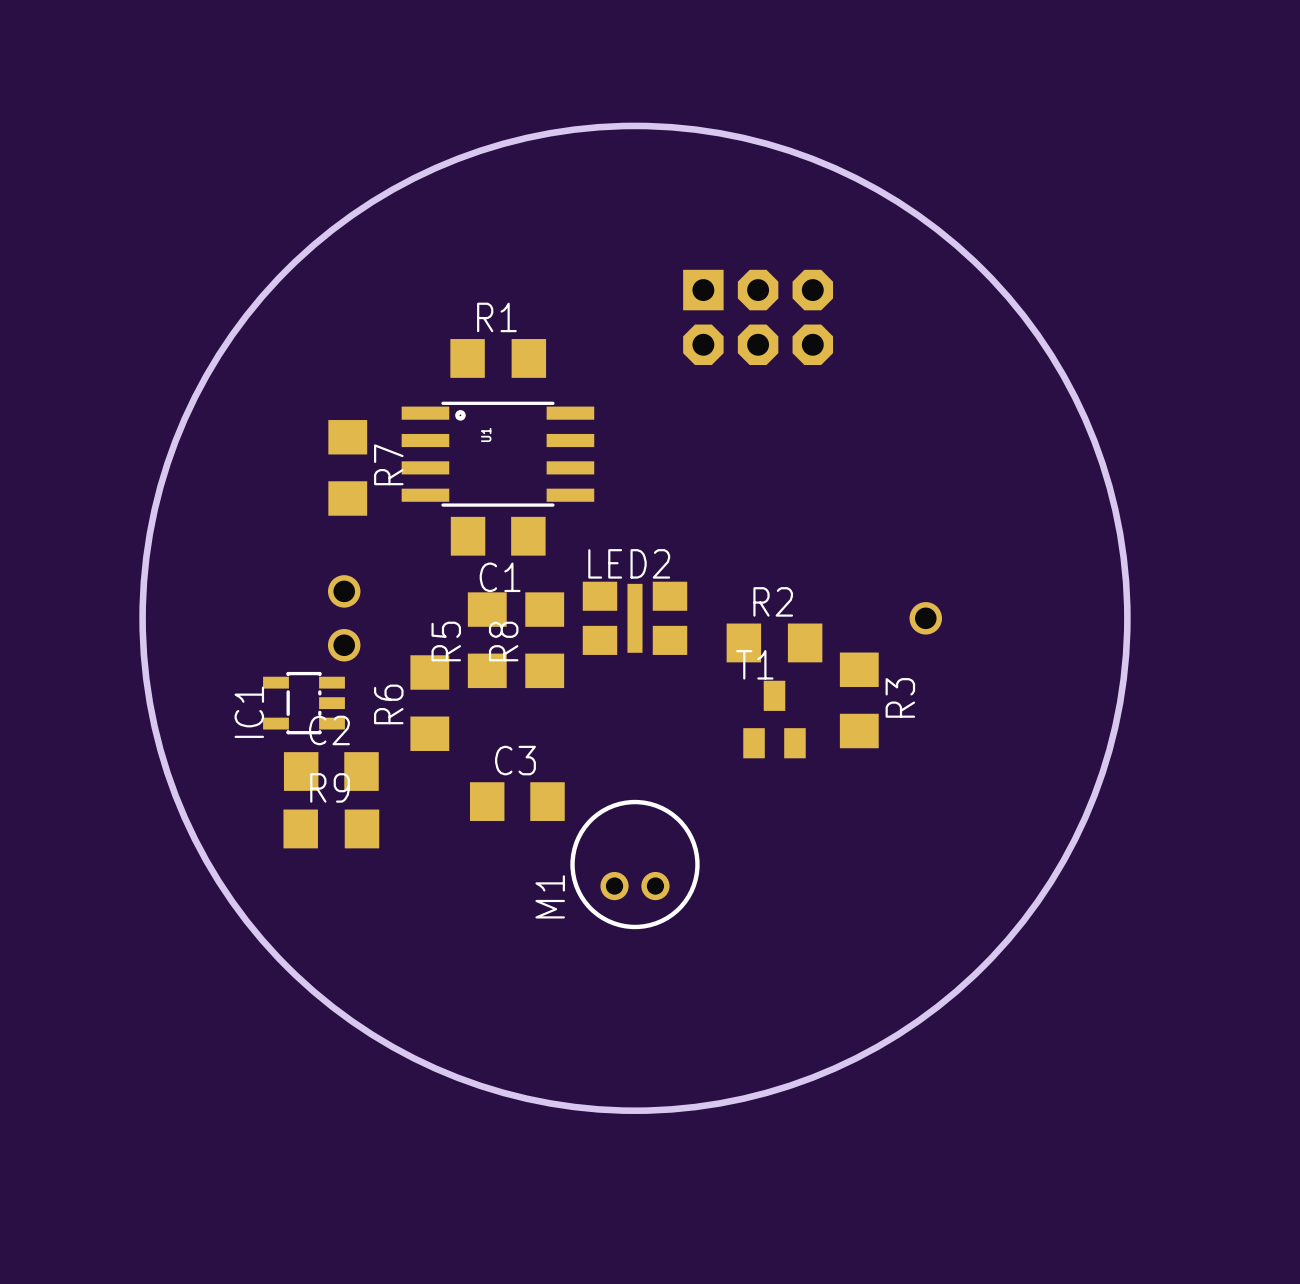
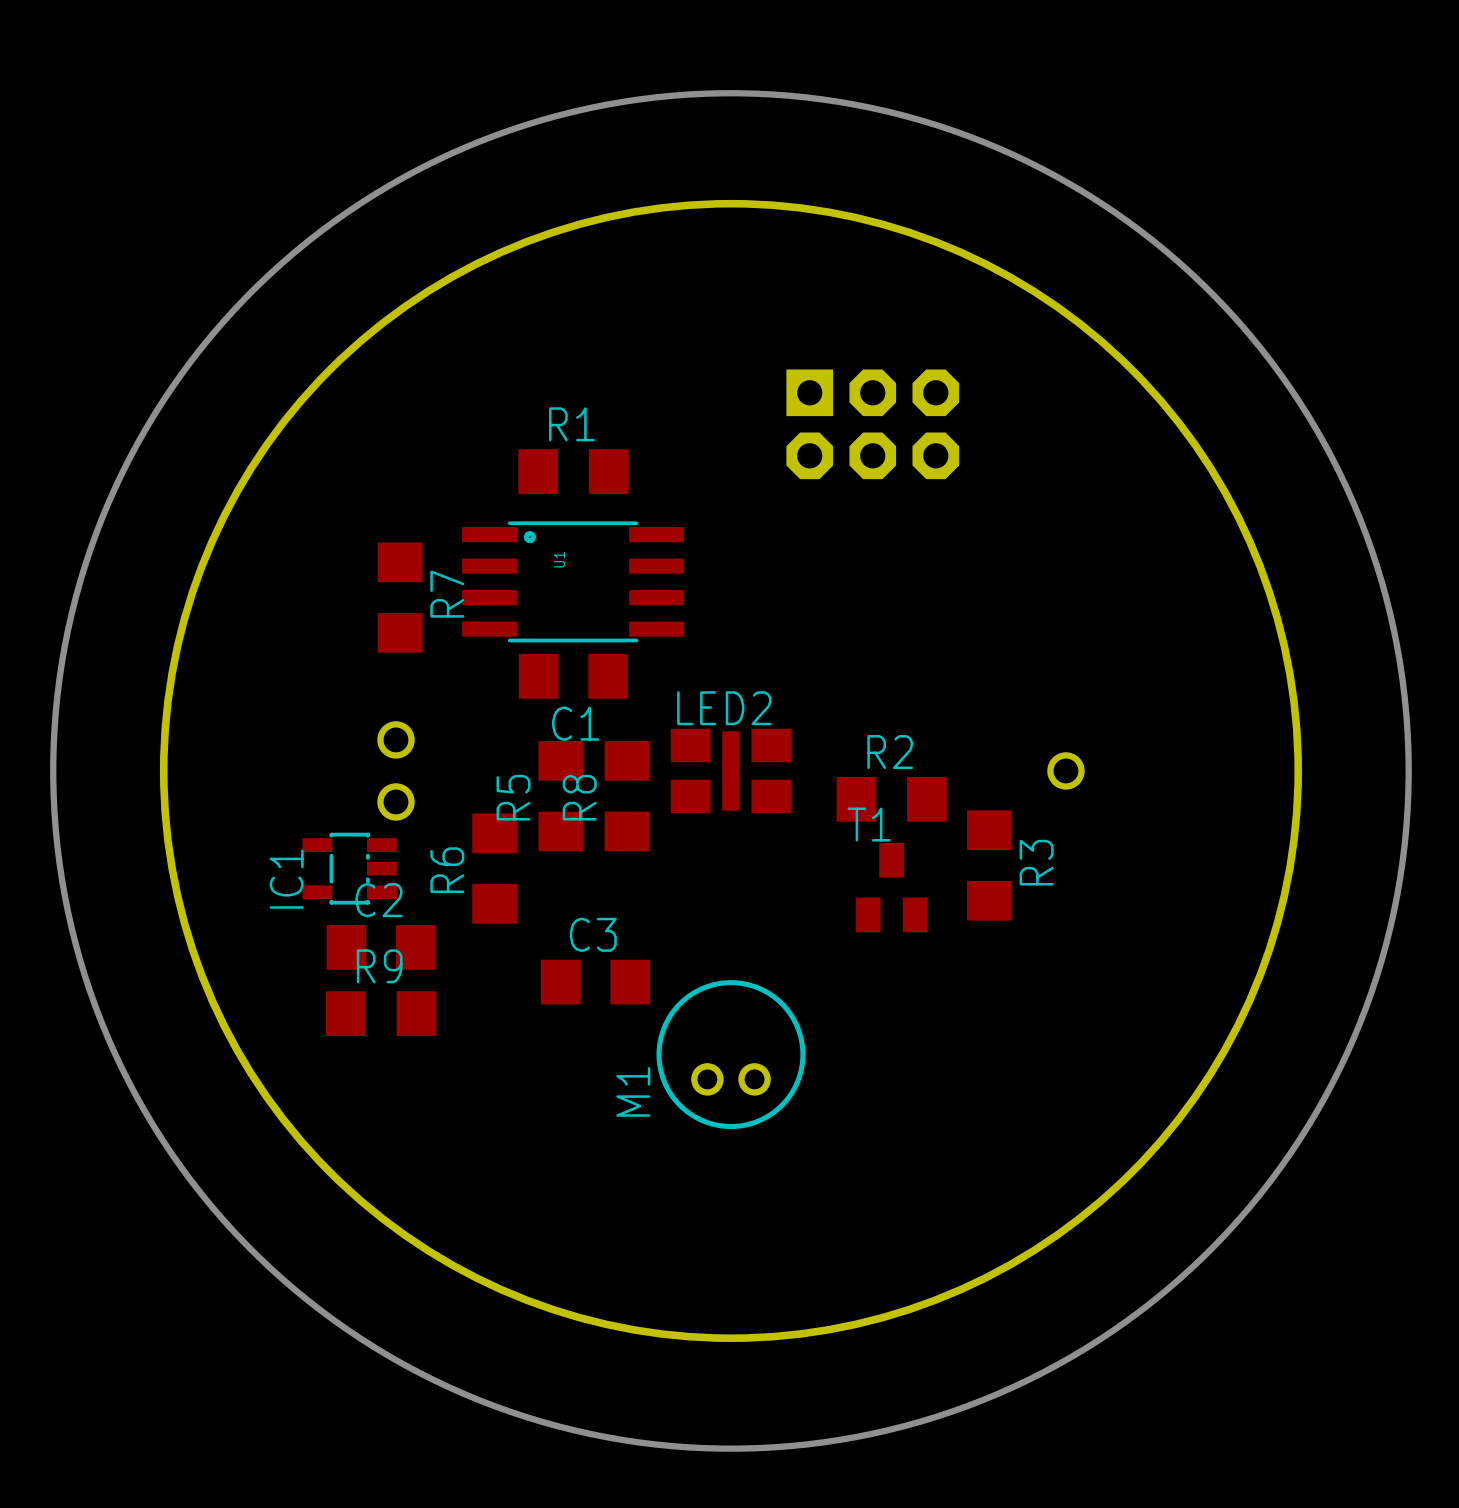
drawing: none -> [50, 90, 1412, 1452]

